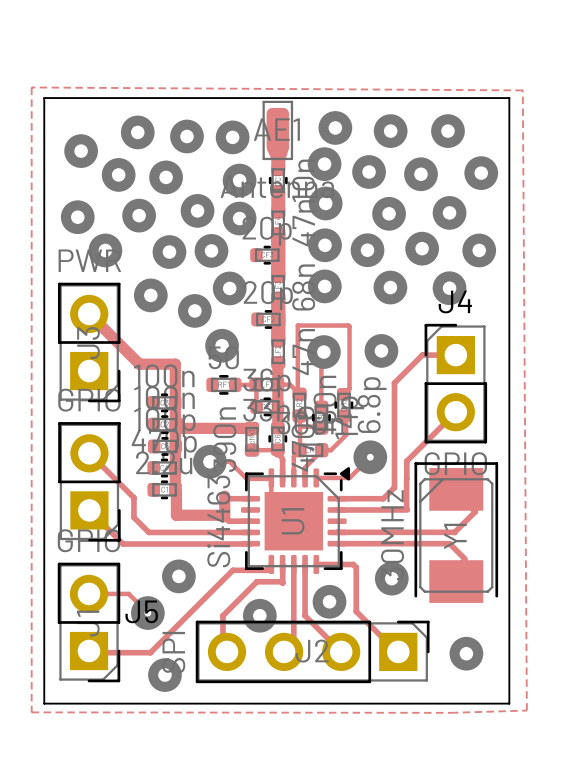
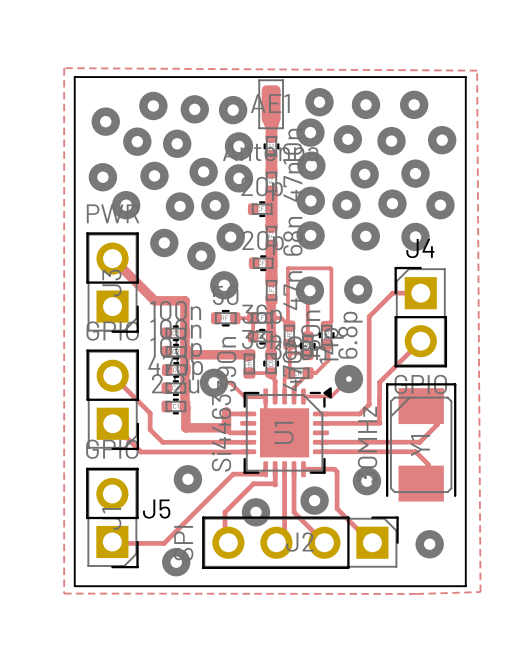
track: (88, 593) (128, 593) (147, 613) -> none
via: (147, 613) -> none

